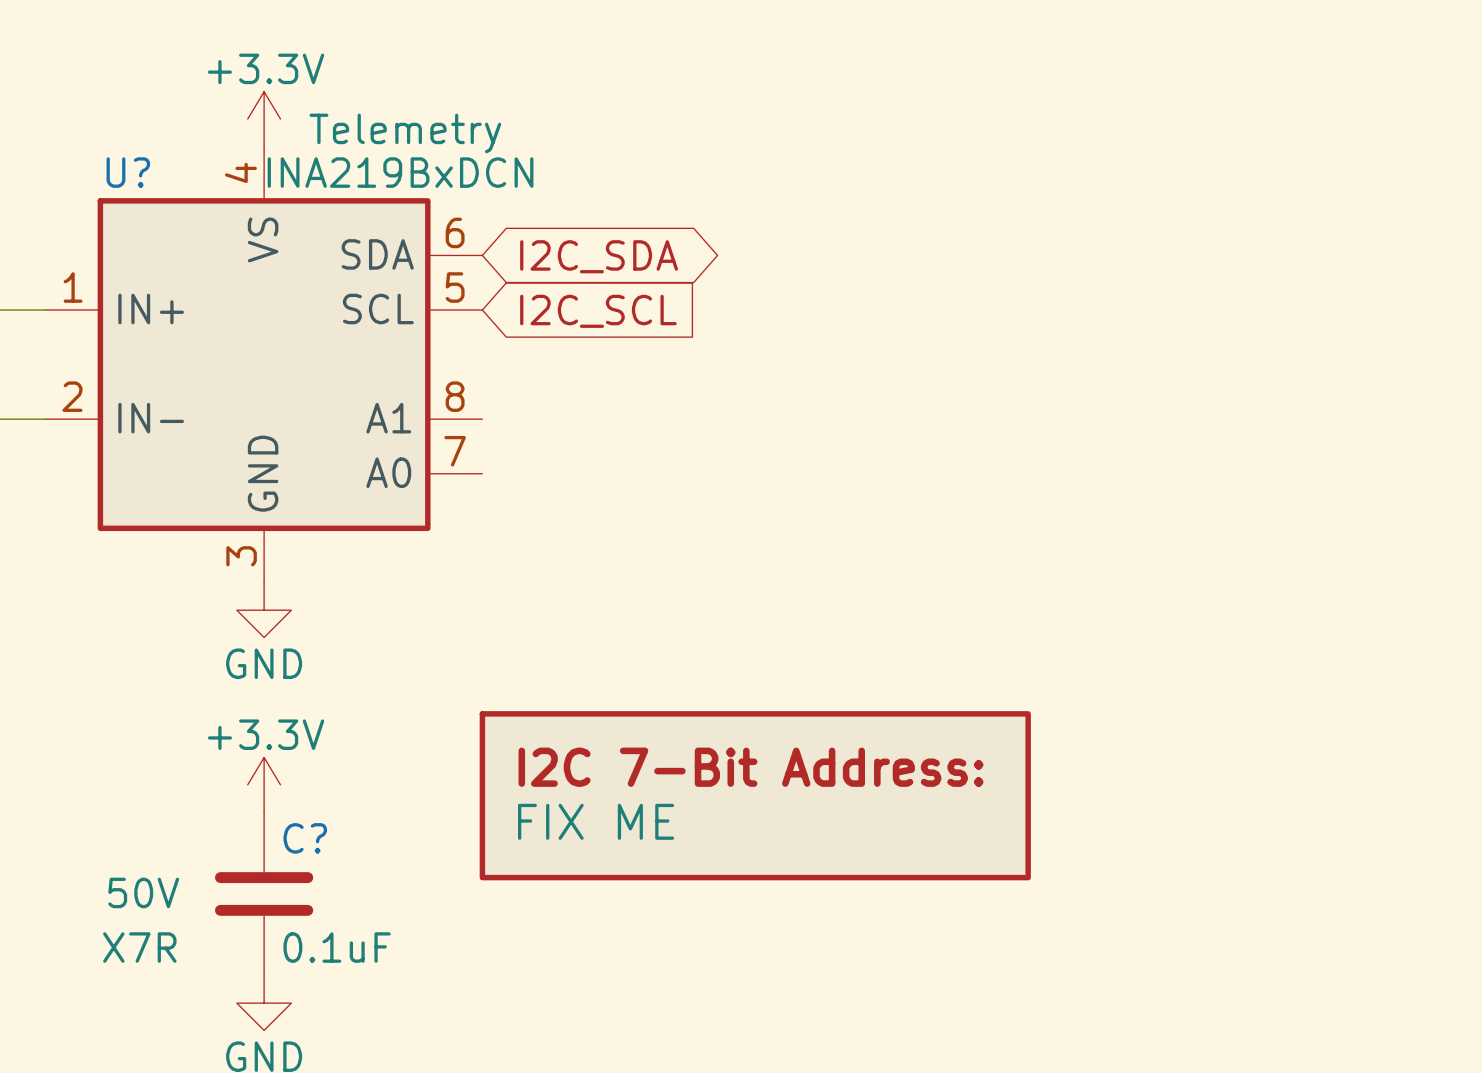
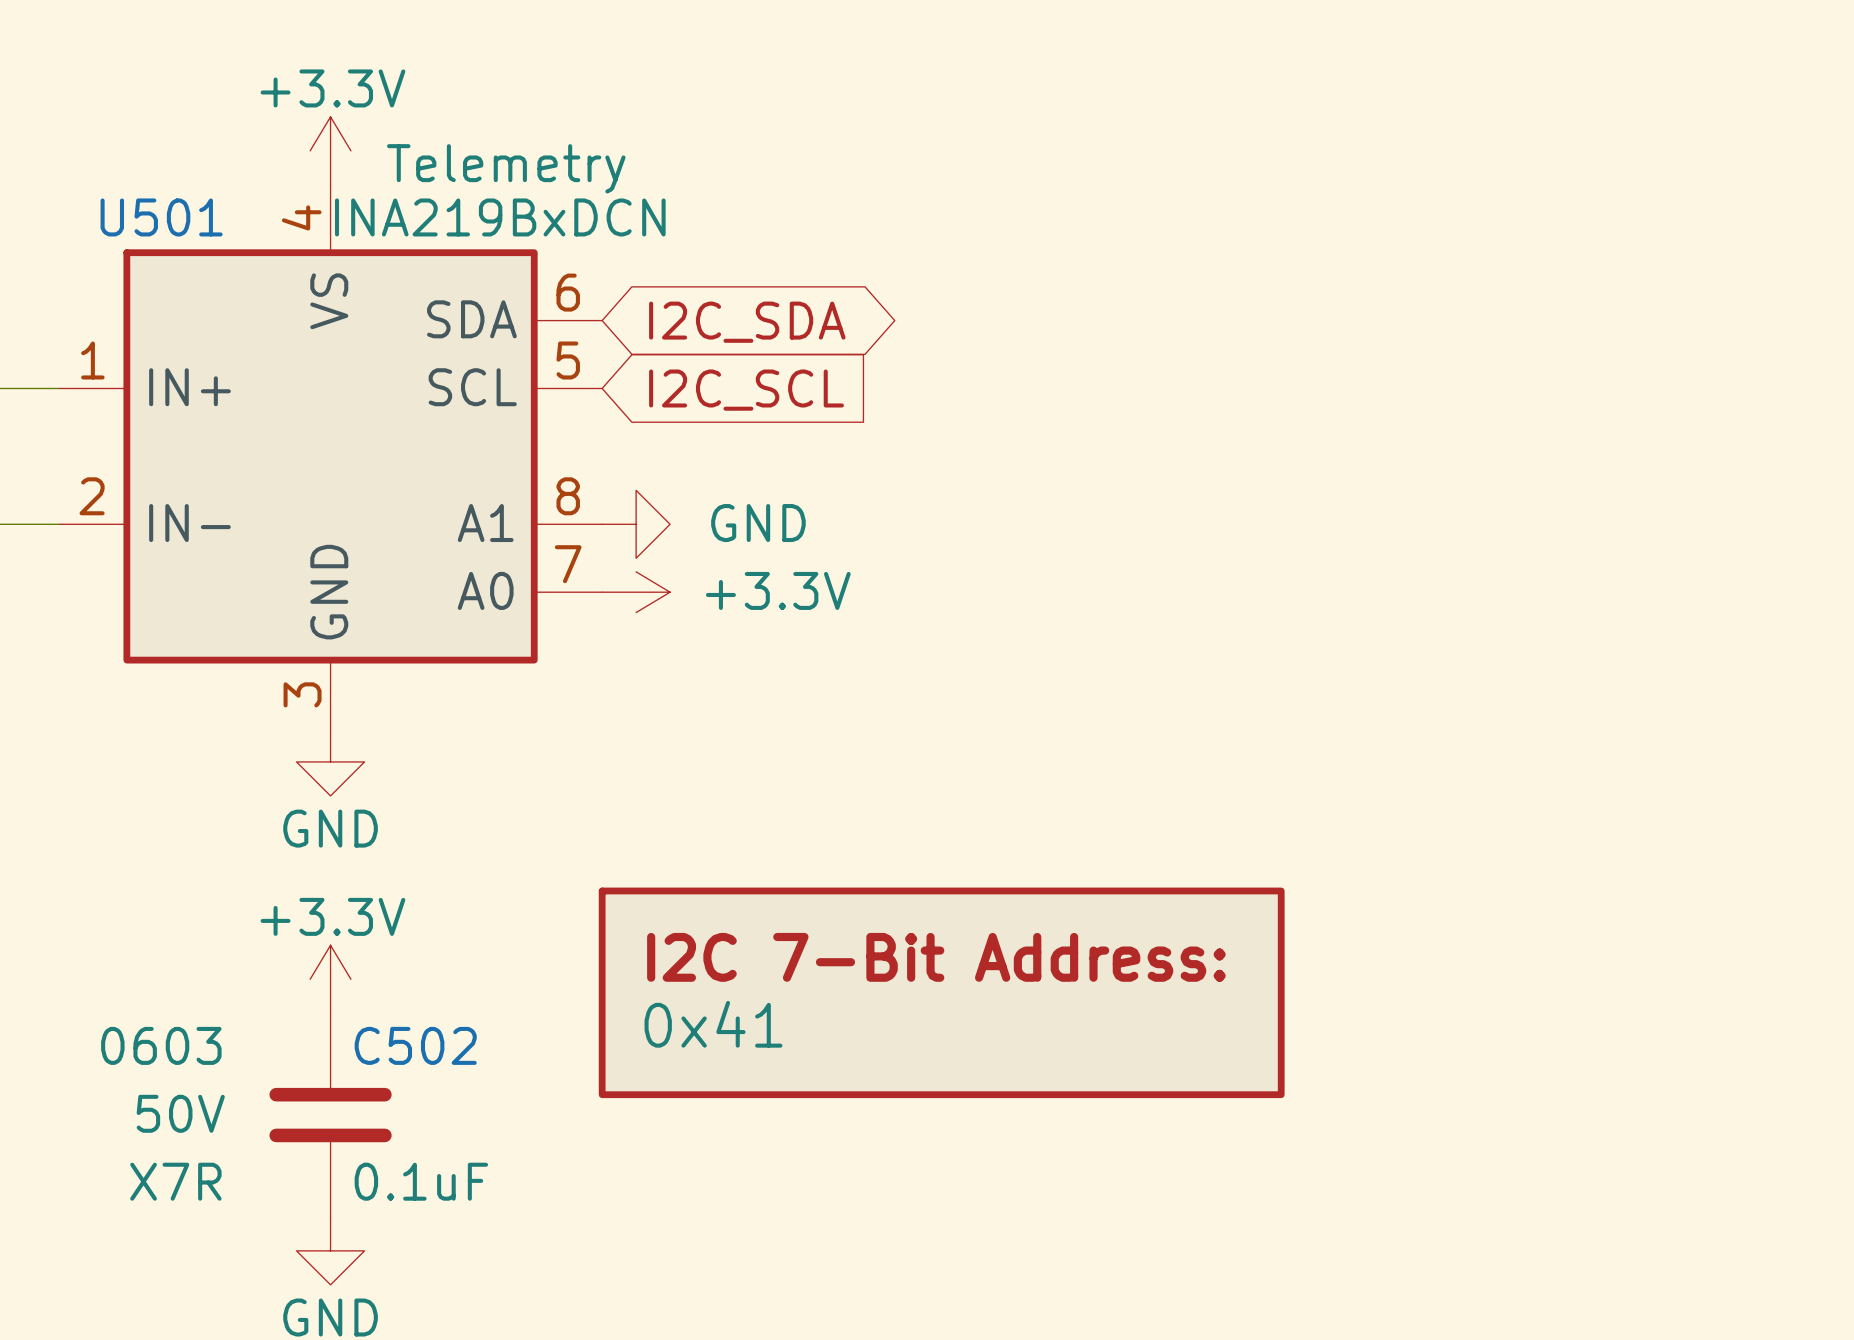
U? name: U? (128, 172) -> U501 (161, 217)
power symbol: none -> GND (636, 524)
power symbol: none -> +3.3V (636, 592)
part value: FIX ME (596, 821) -> 0x41 (713, 1024)
C? text: none -> 0603 (161, 1045)
C? name: C? (305, 838) -> C502 (415, 1045)

